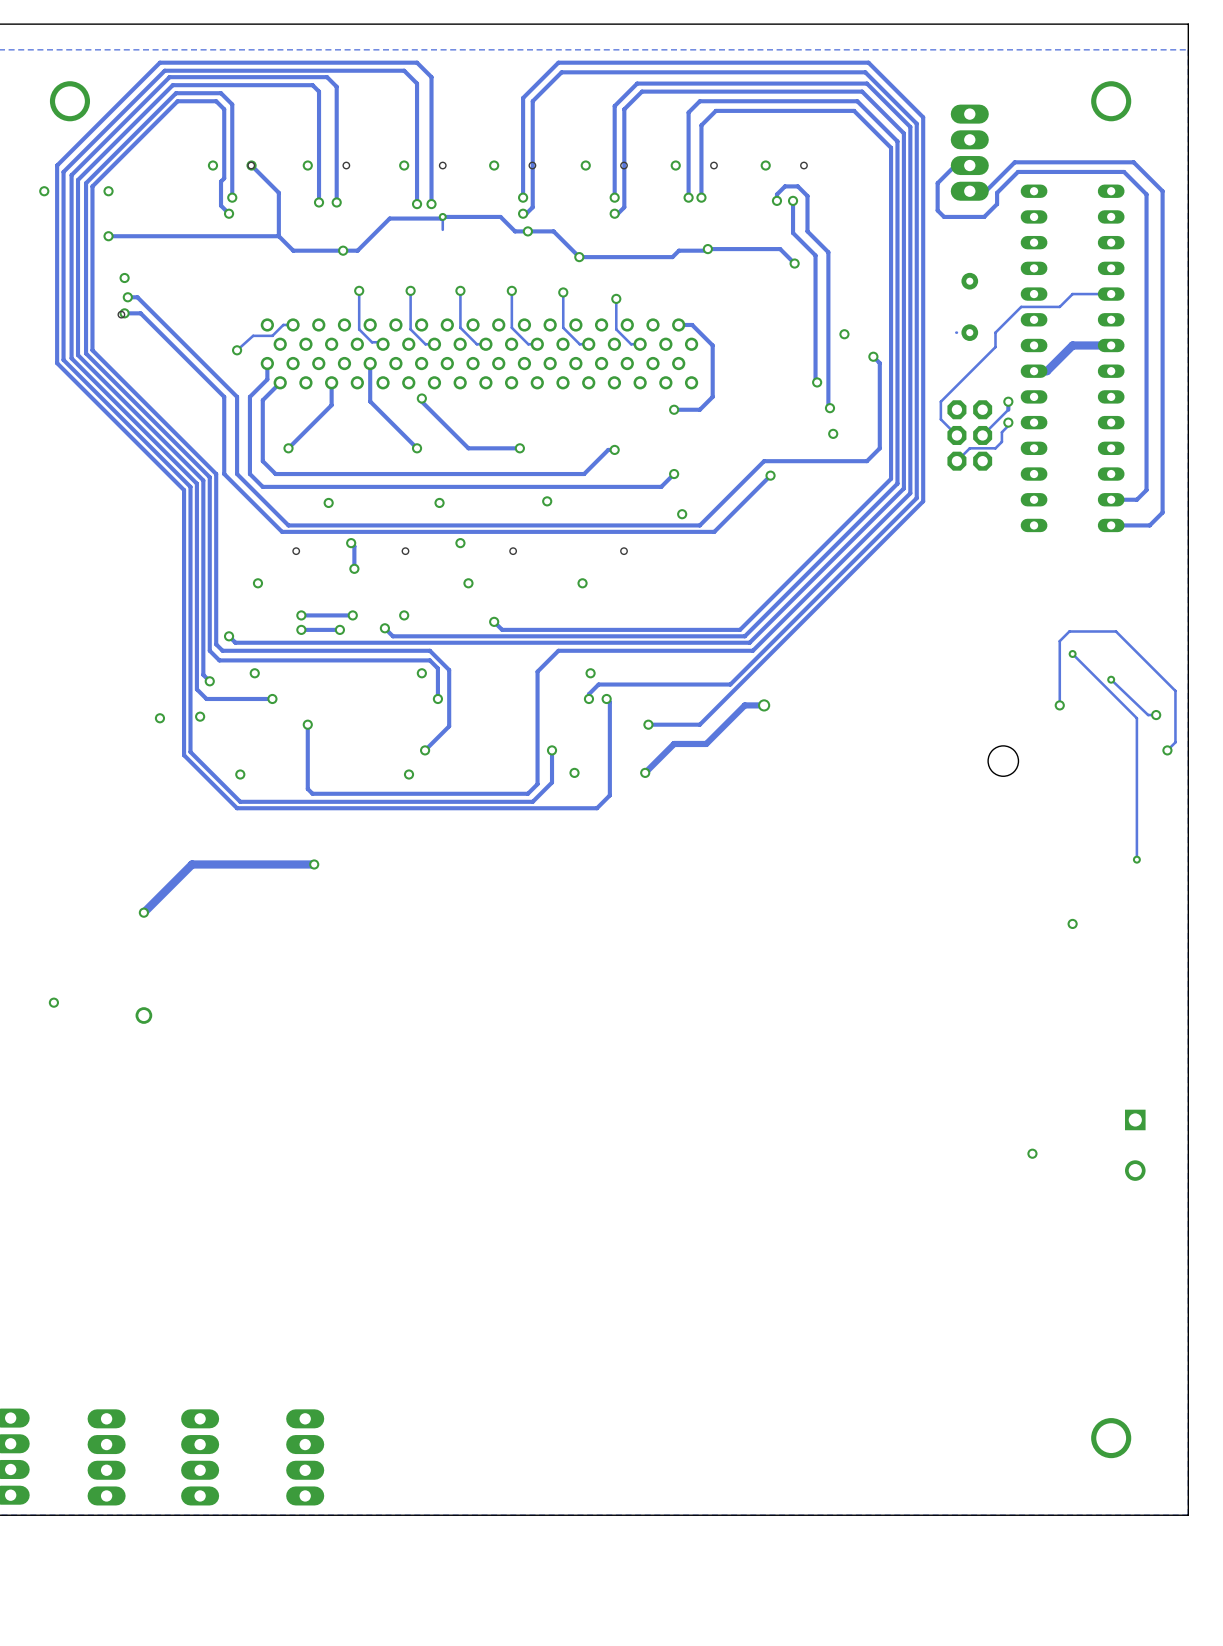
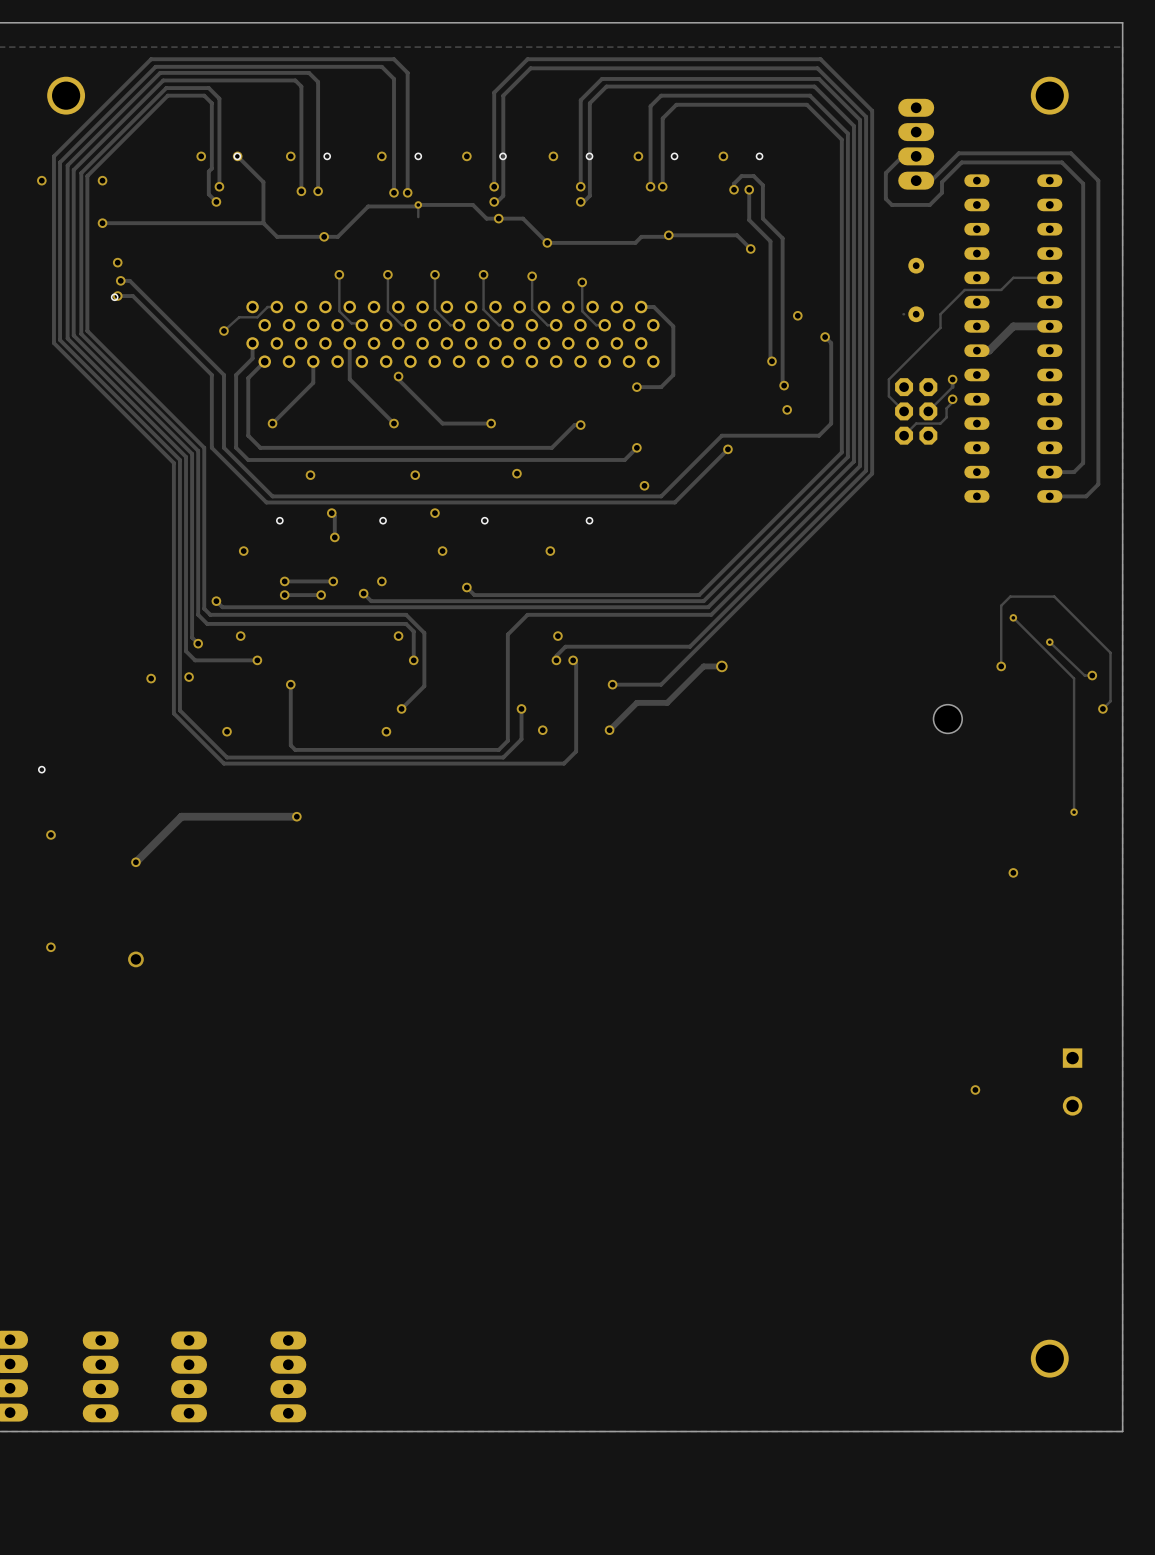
part: none -> (41, 769)
via: none -> (50, 834)

